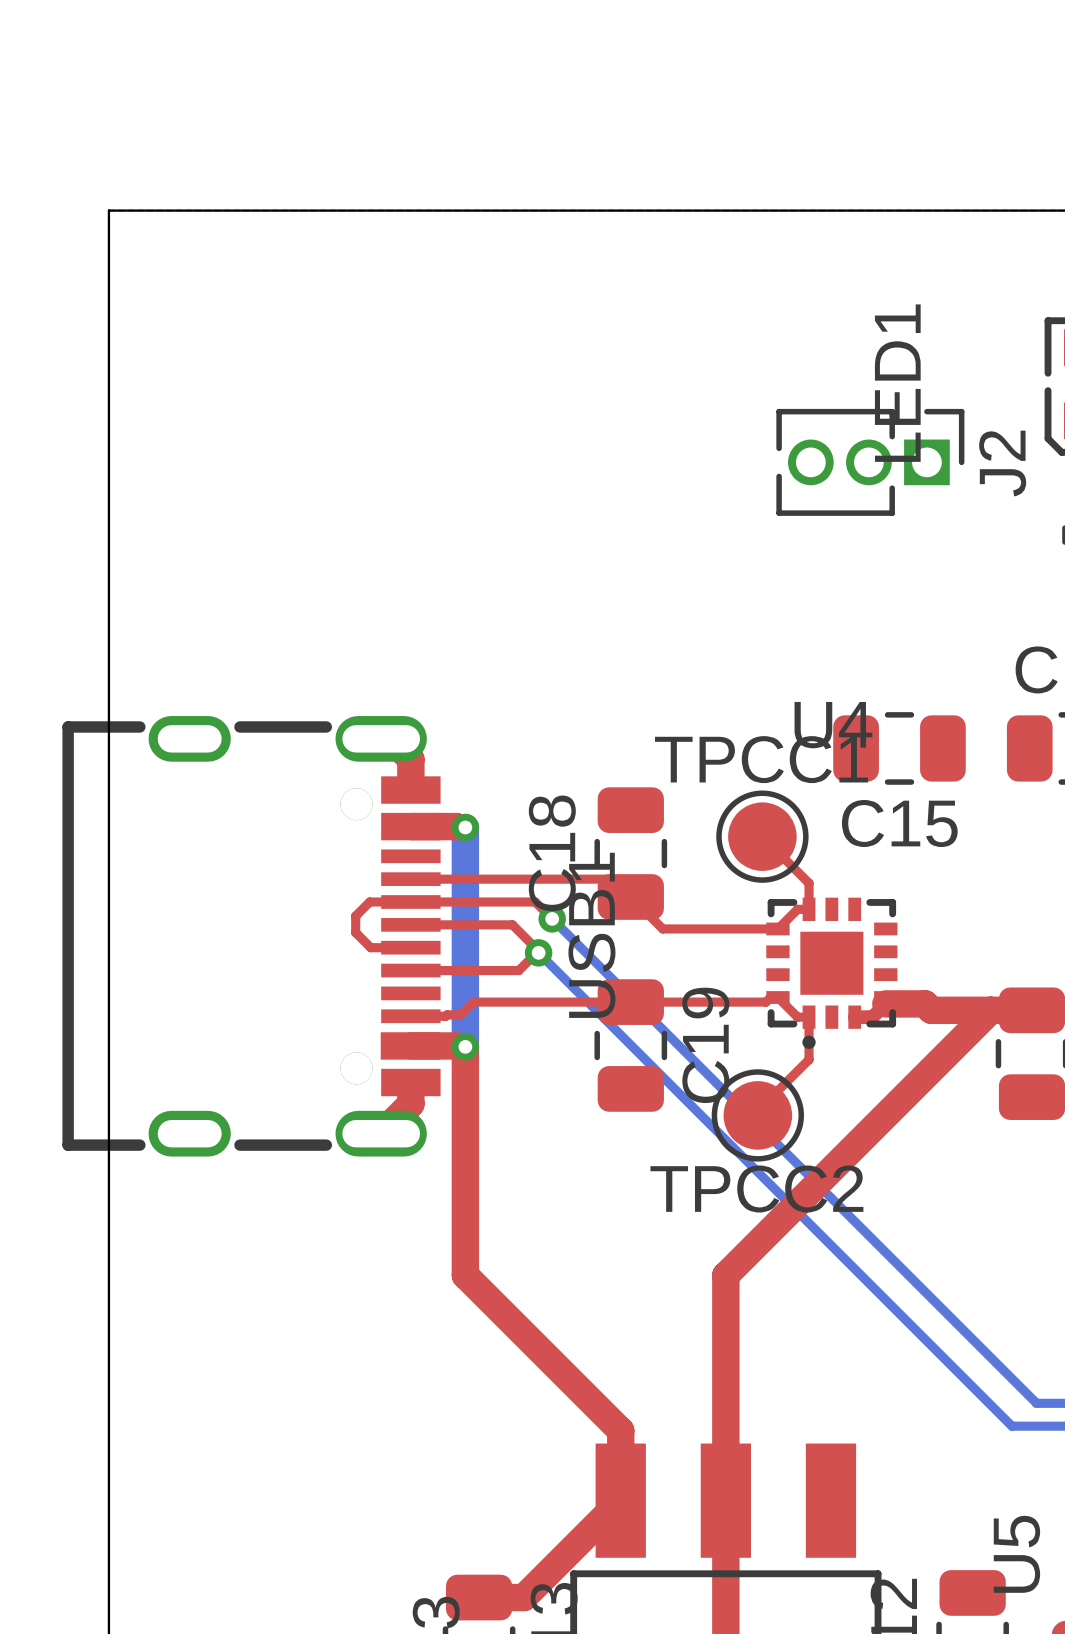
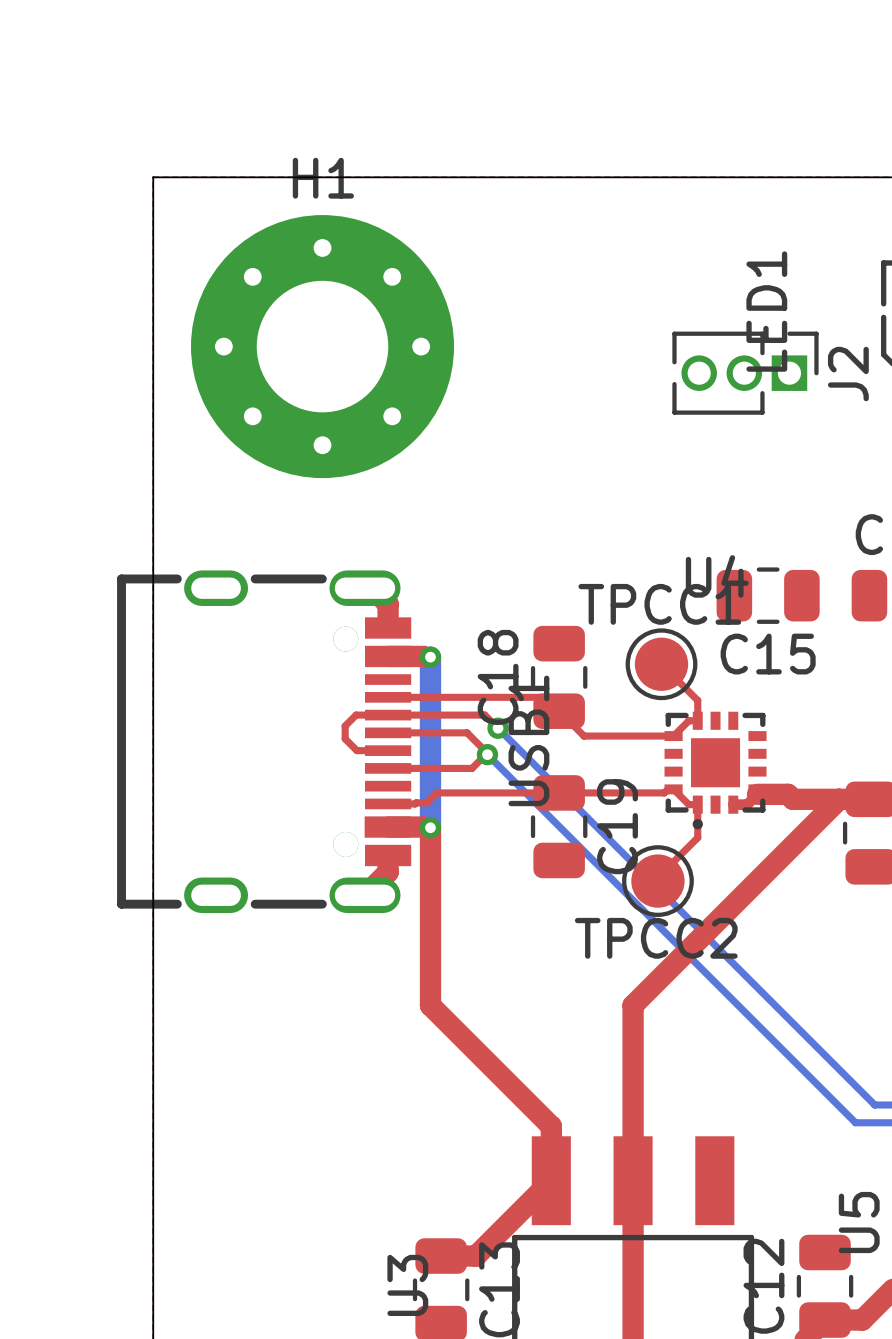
H1: none -> (322, 346)

